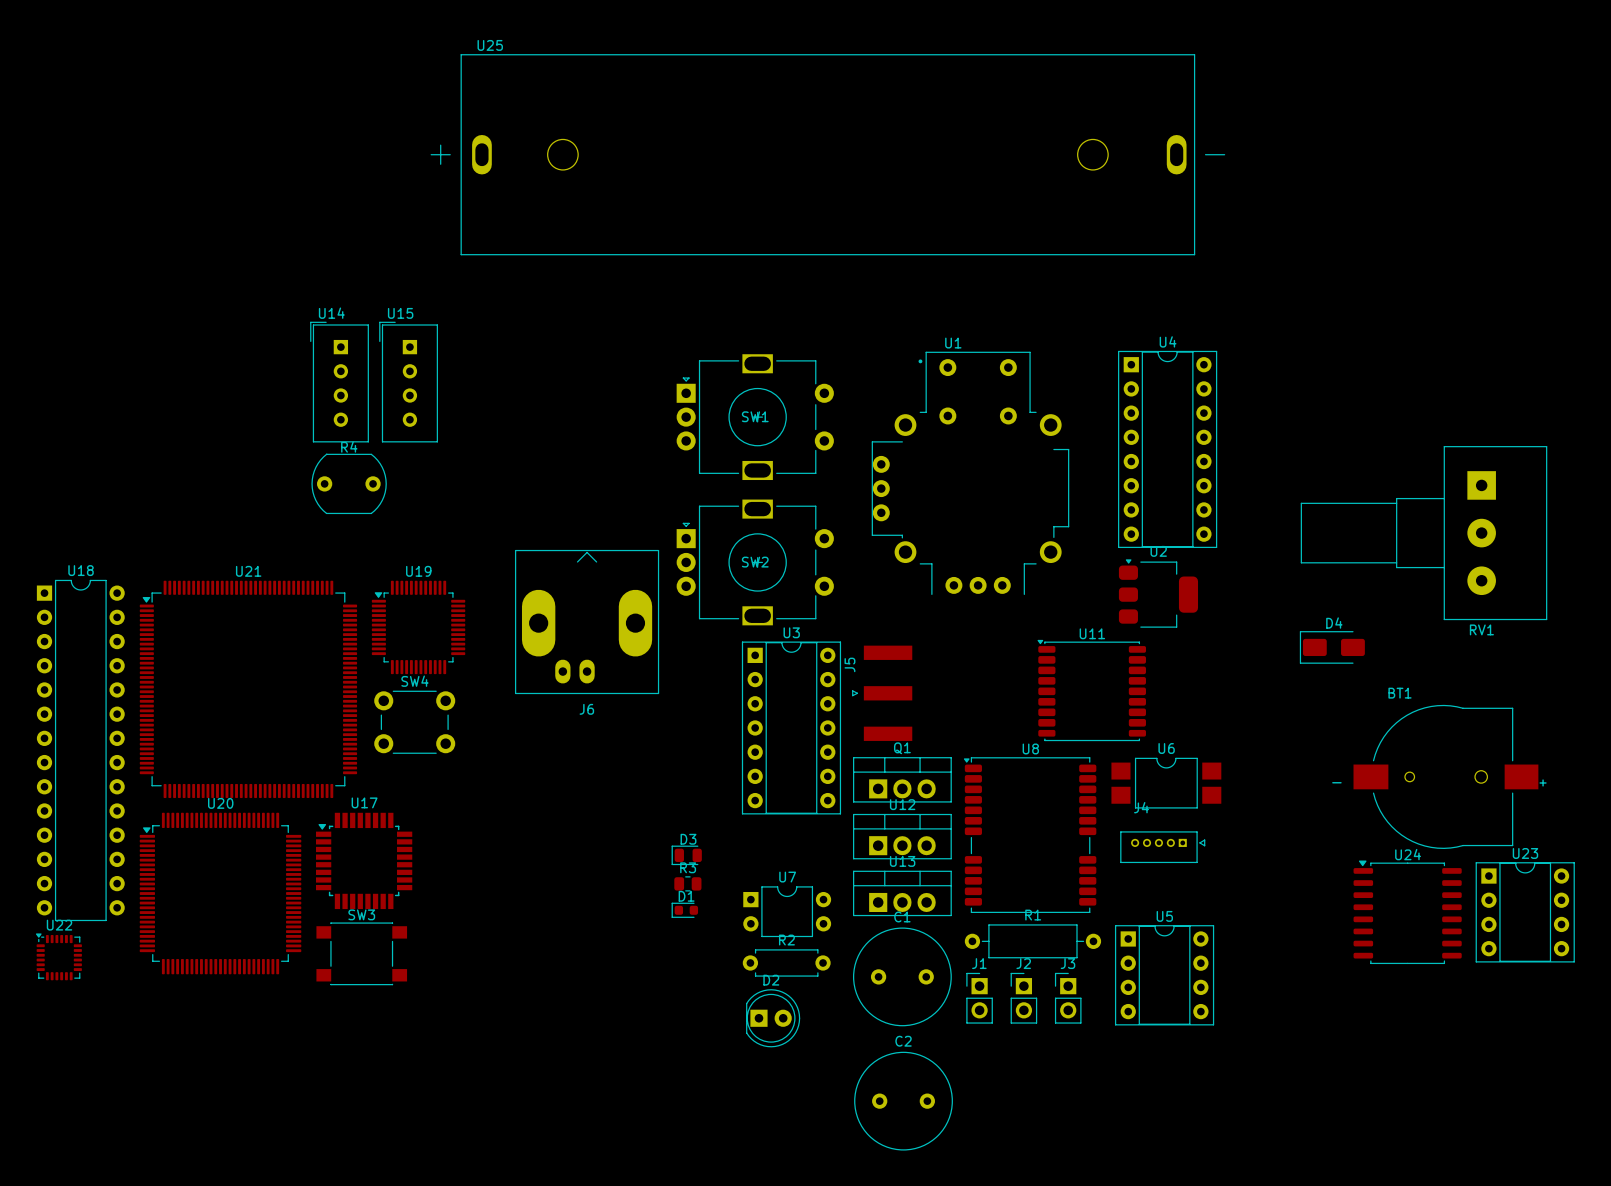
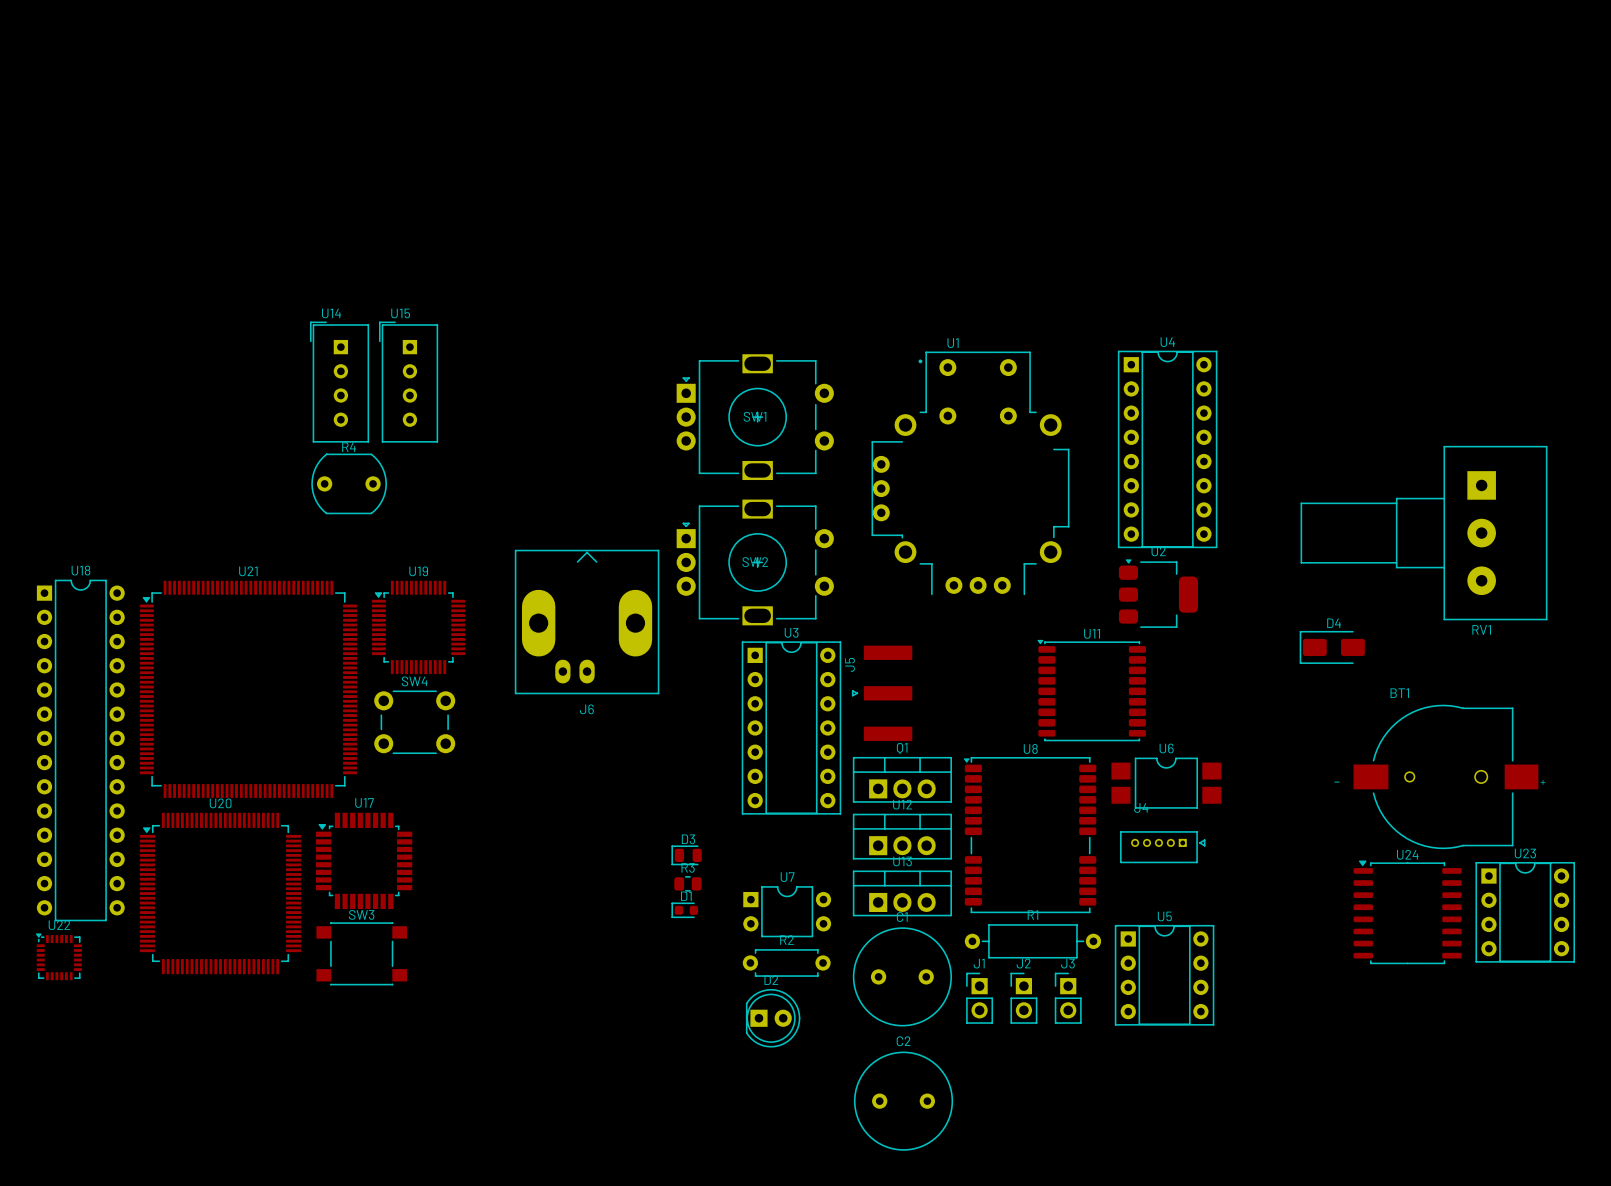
U25: (827, 154) -> none

